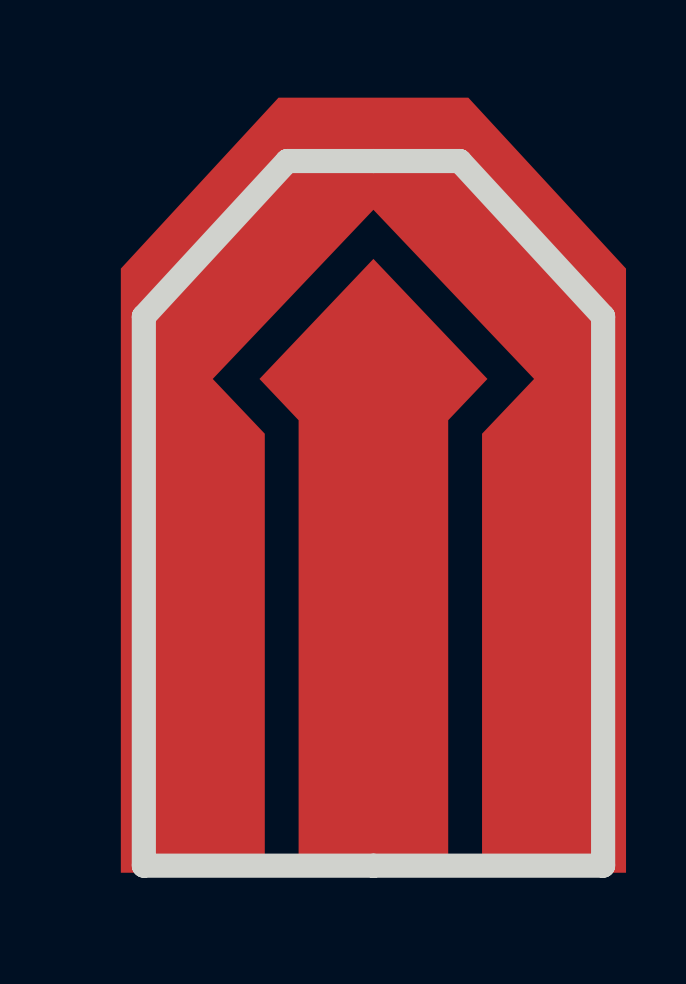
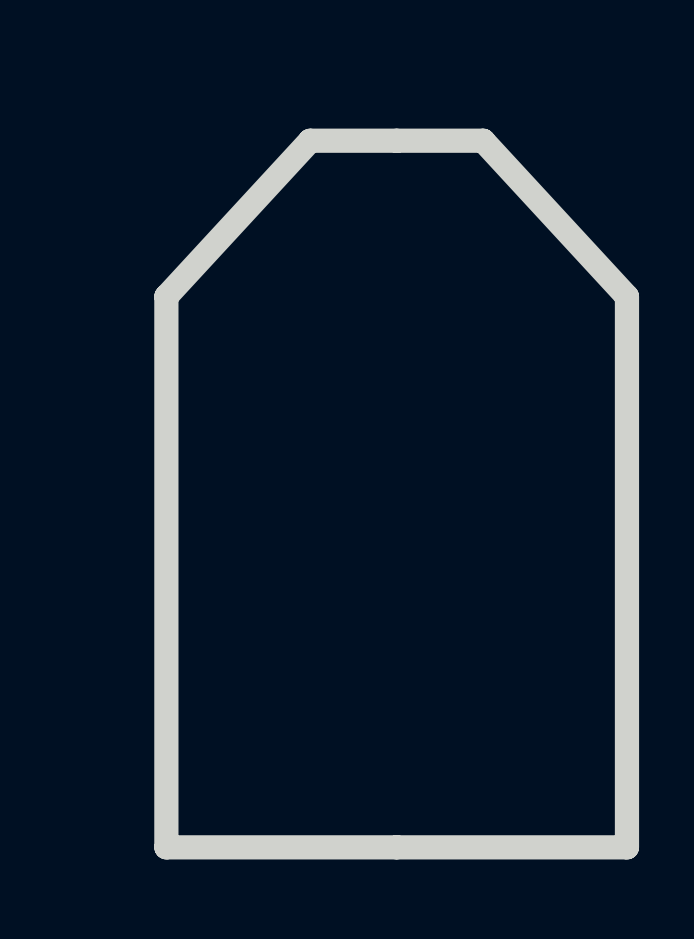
drawing: [120, 97, 627, 873] -> none

